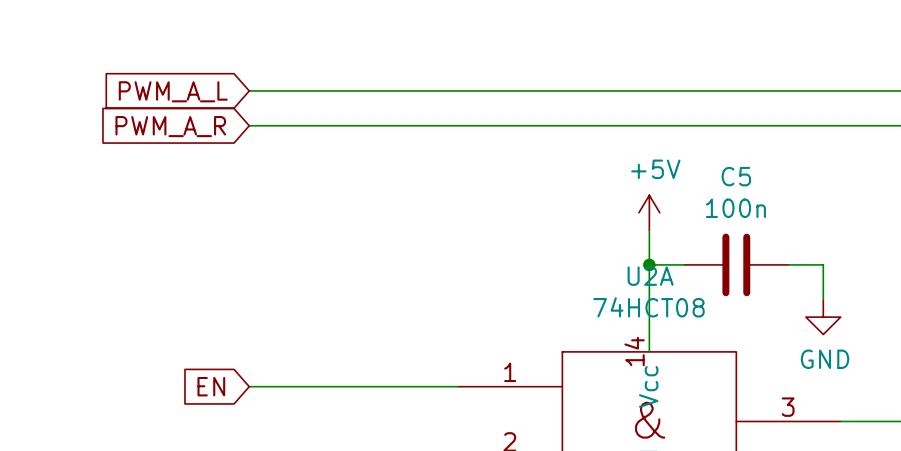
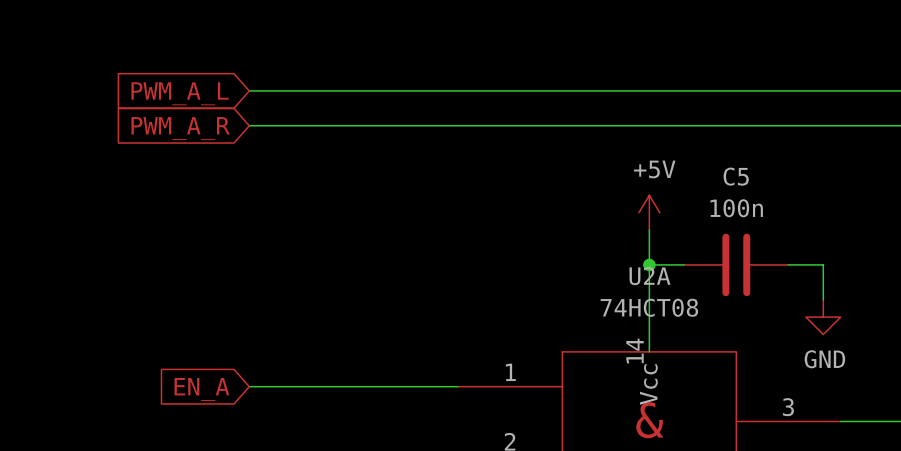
global label: EN (211, 386) -> EN_A (201, 389)

